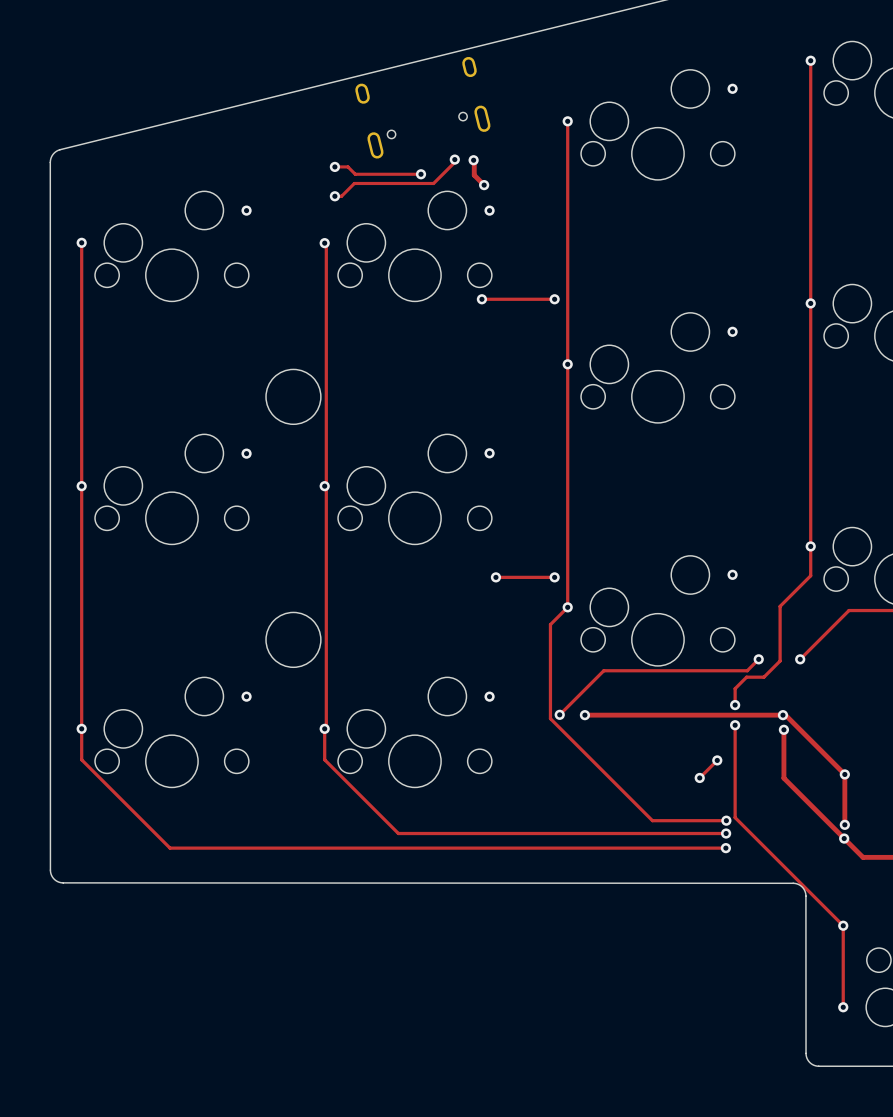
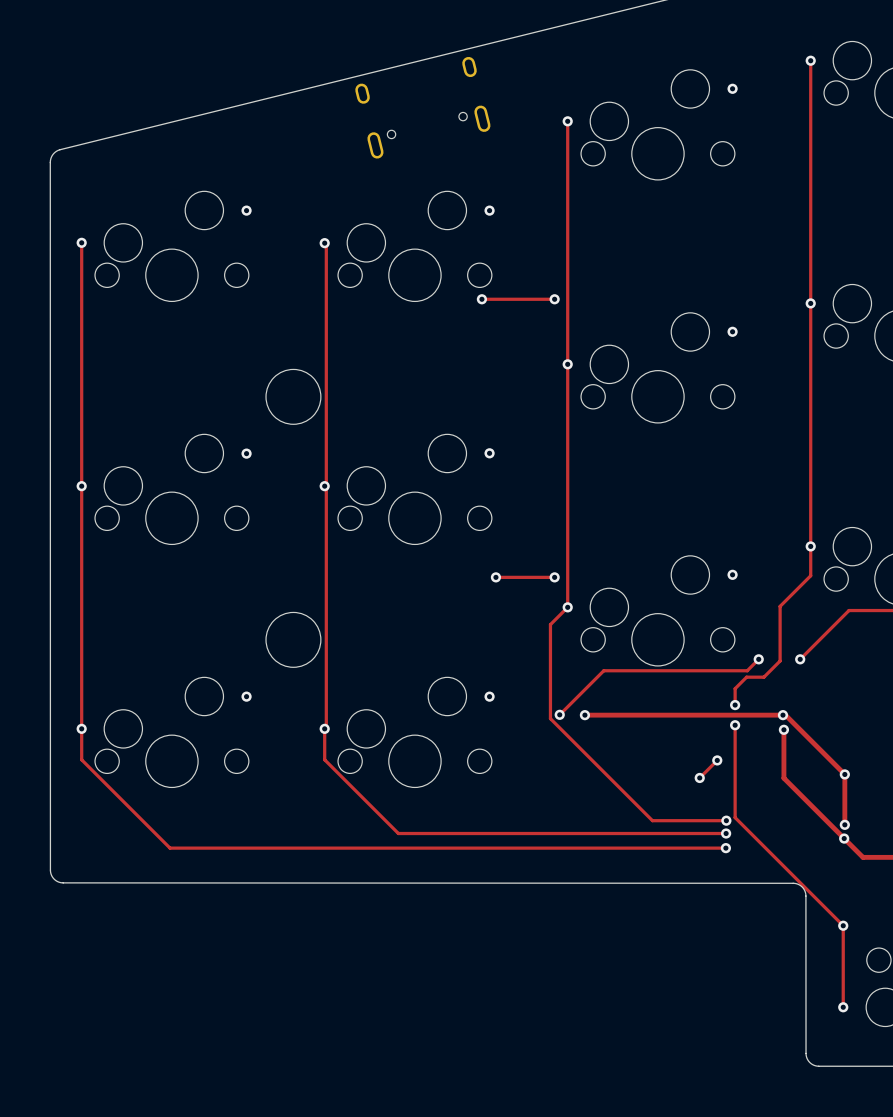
track: (454, 159) (454, 162) (433, 183) (354, 183) (341, 196) (334, 196) -> none
via: (454, 159) -> none
via: (473, 160) -> none
track: (474, 161) (474, 175) (484, 185) -> none
track: (334, 166) (347, 166) (355, 174) (421, 174) -> none
via: (334, 166) -> none
via: (421, 174) -> none
via: (484, 185) -> none
via: (334, 196) -> none

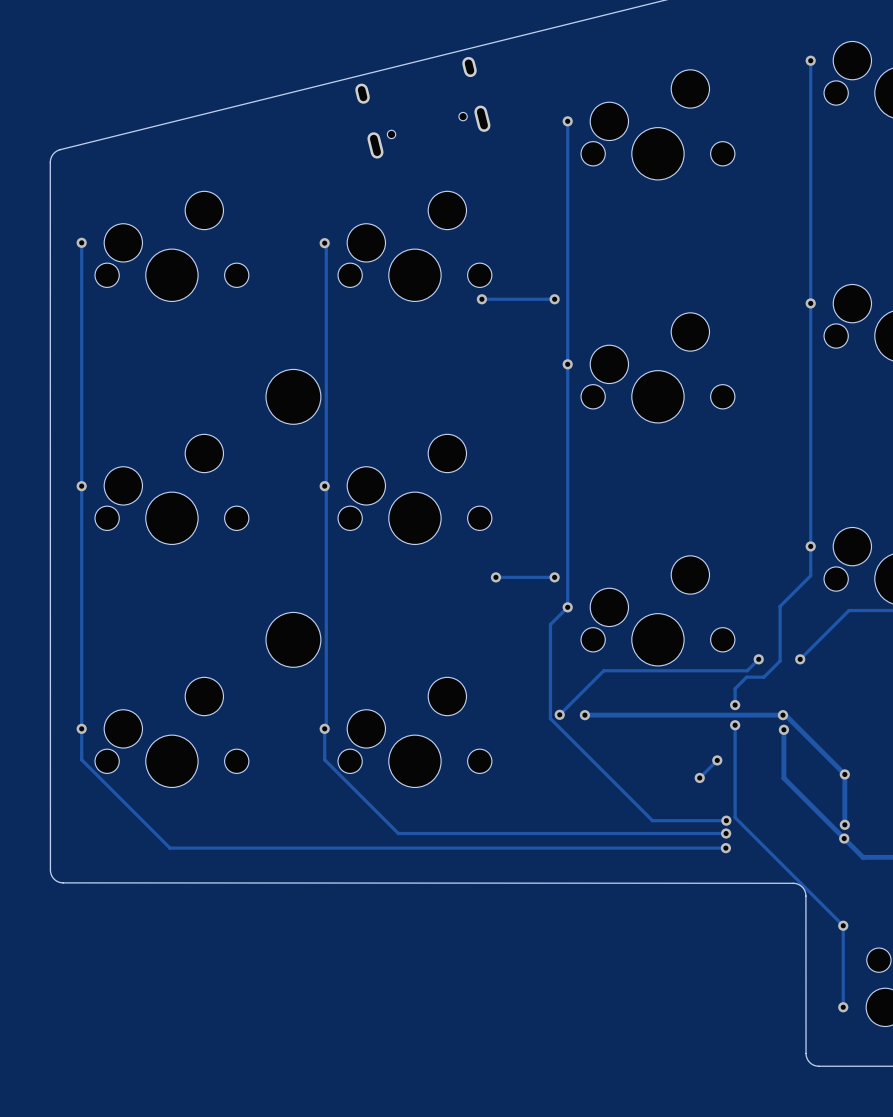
via: (732, 88) -> none
via: (246, 210) -> none
via: (489, 210) -> none
via: (732, 331) -> none
via: (246, 453) -> none
via: (489, 453) -> none
via: (732, 574) -> none
via: (246, 696) -> none
via: (489, 696) -> none

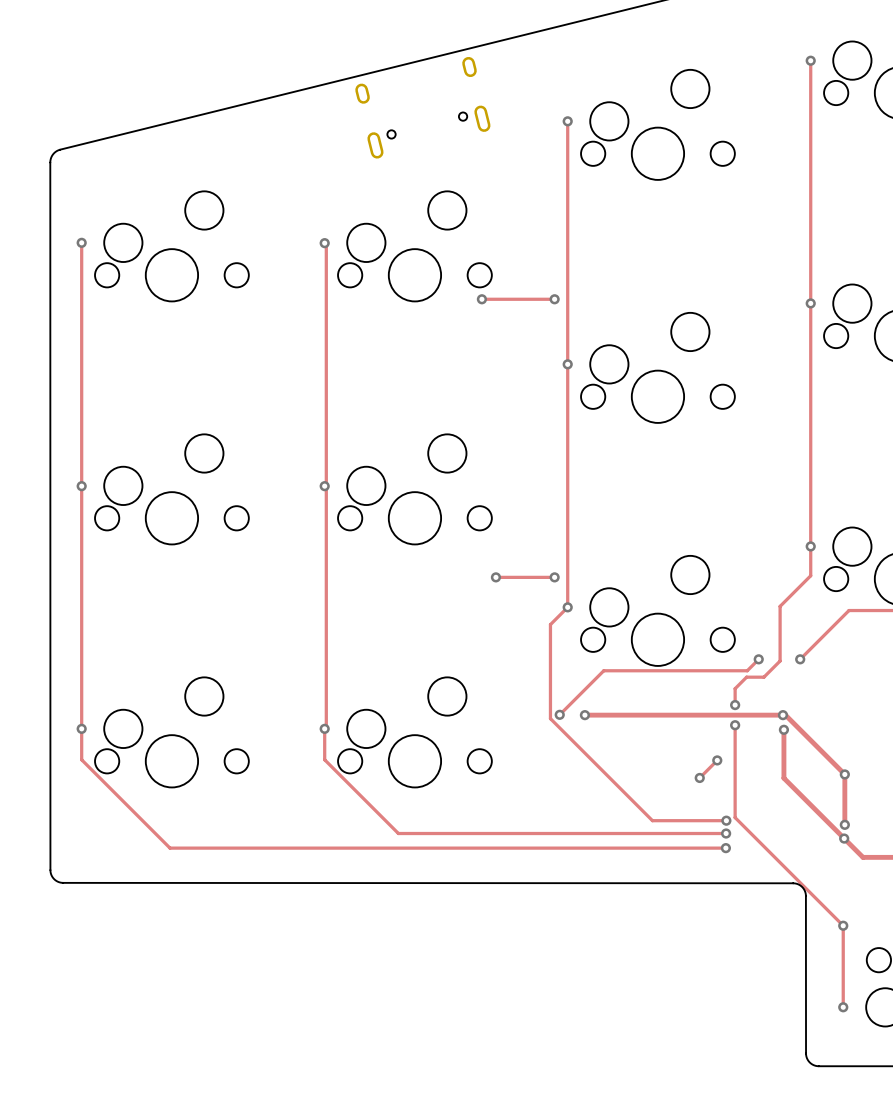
part: (293, 396) -> none
part: (293, 639) -> none

